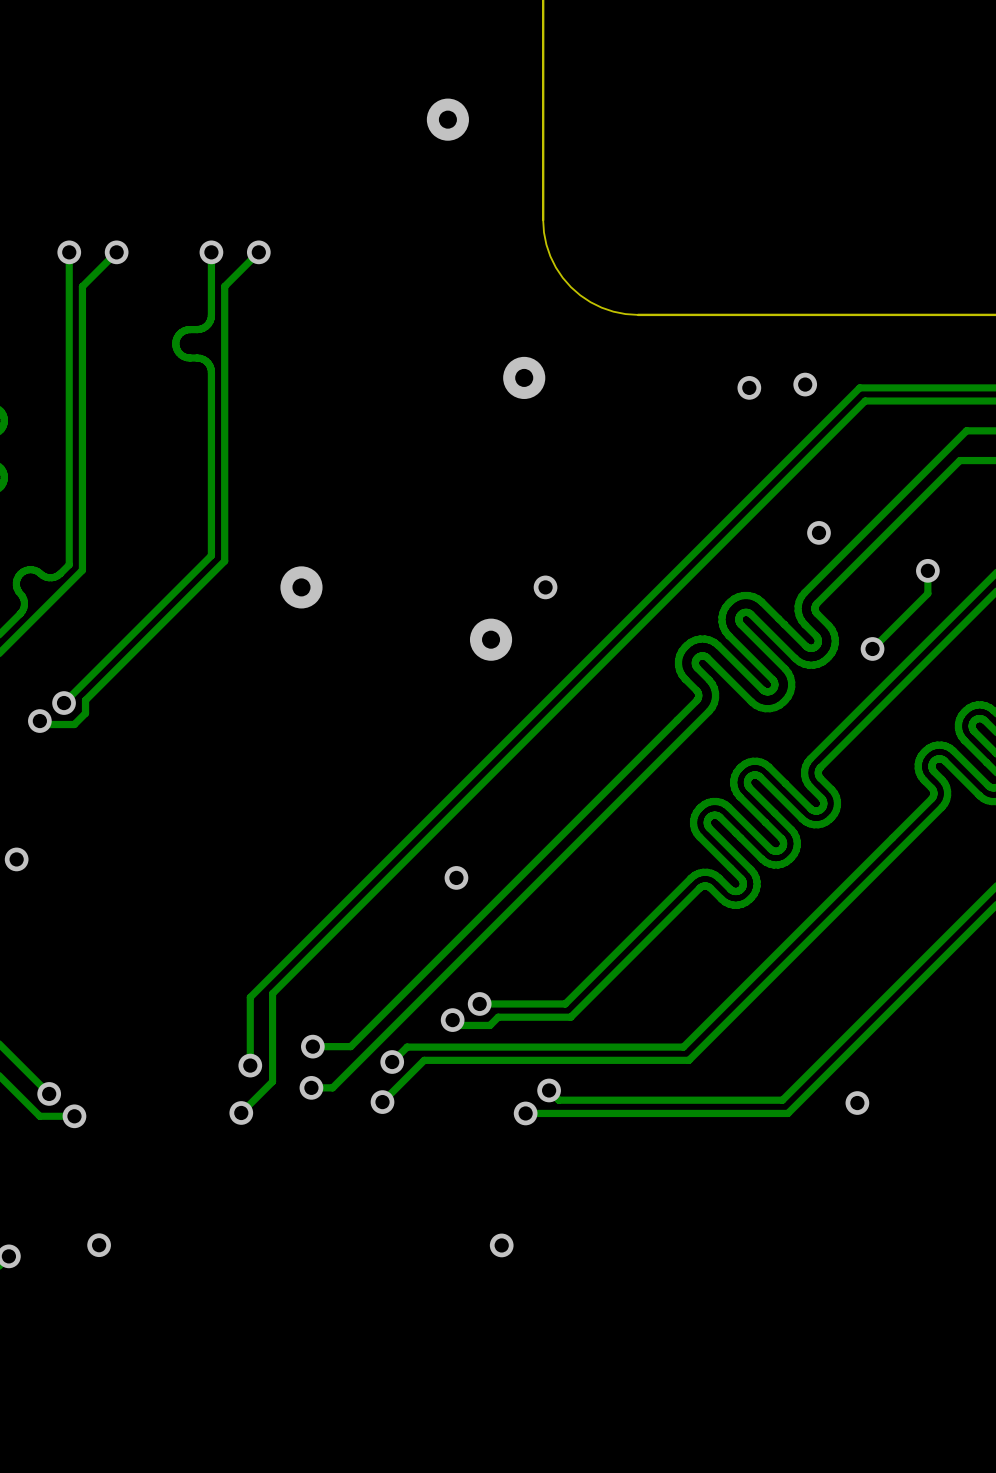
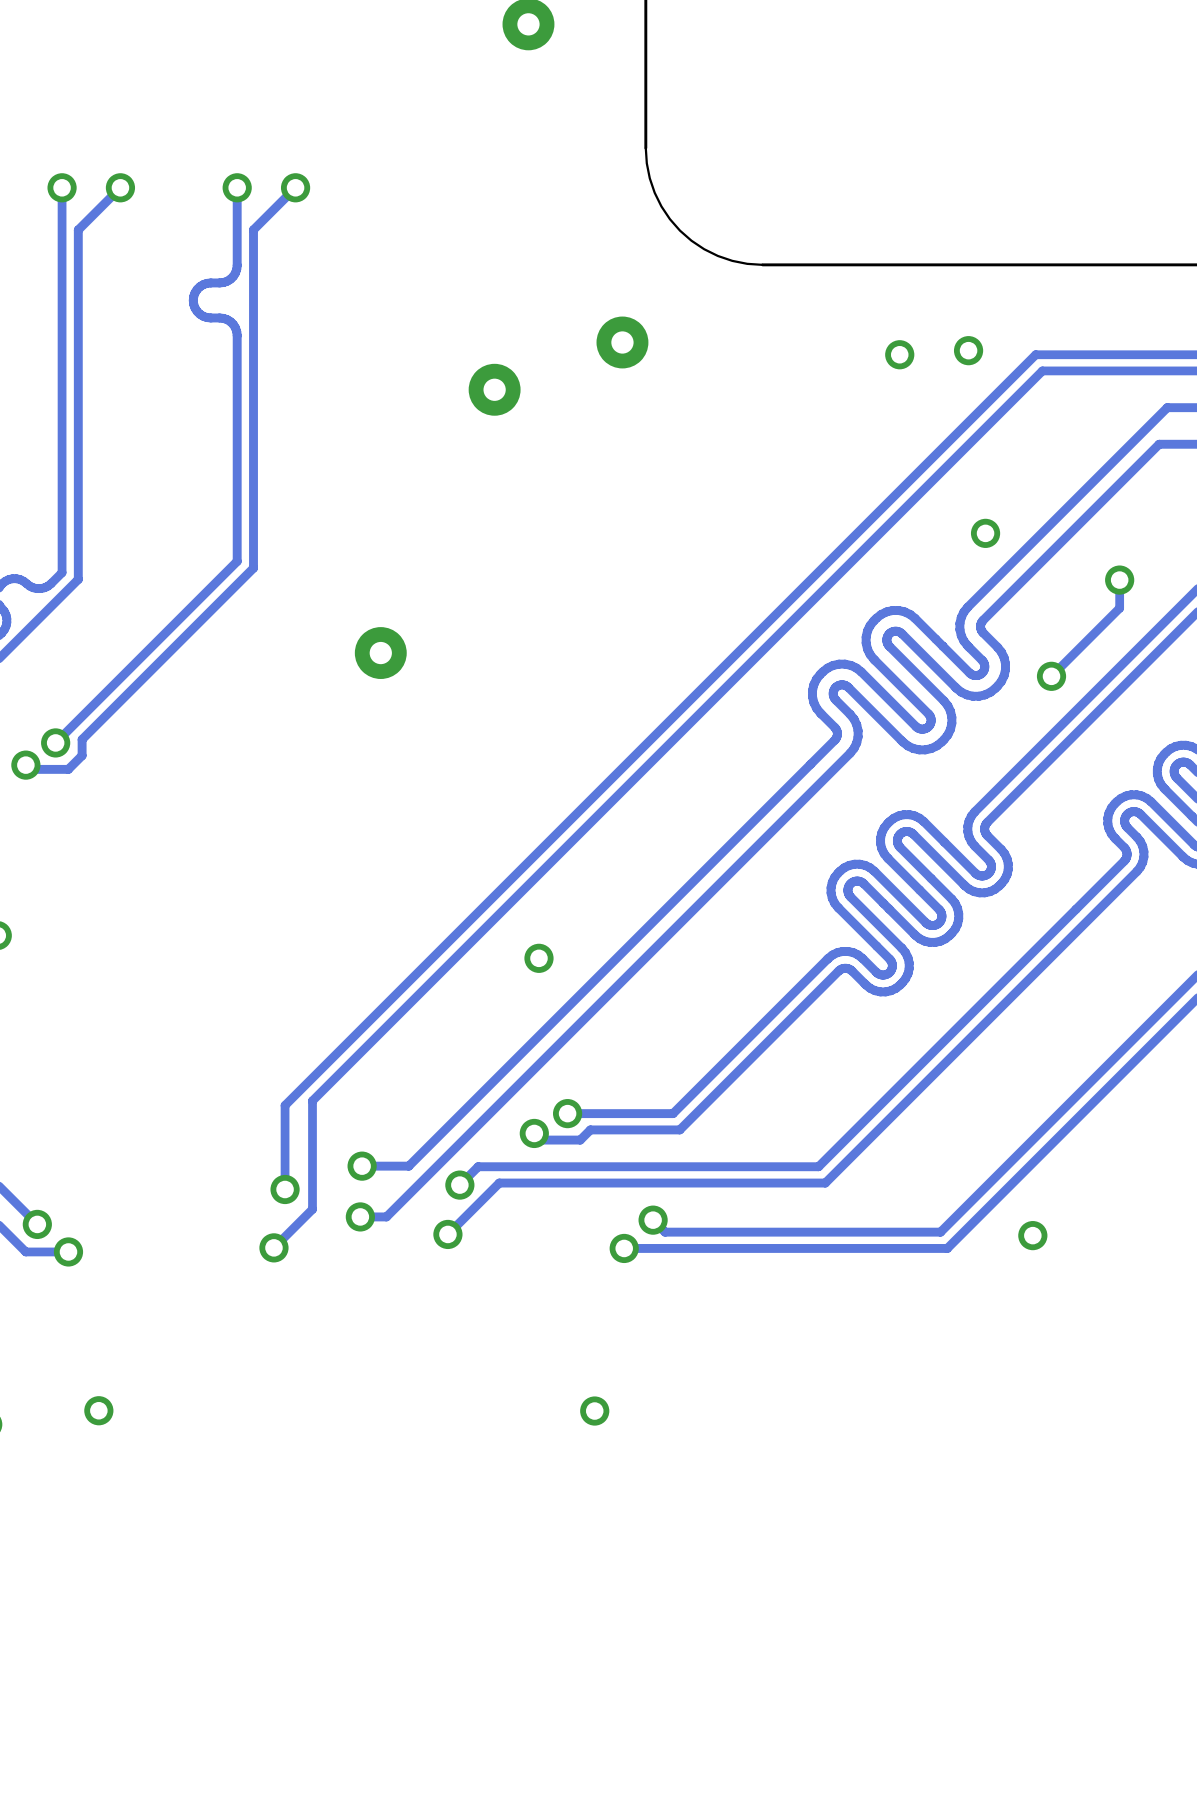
via: none -> (494, 389)
via position: (301, 587) -> (380, 653)
via: (545, 587) -> none
via: (491, 639) -> none

